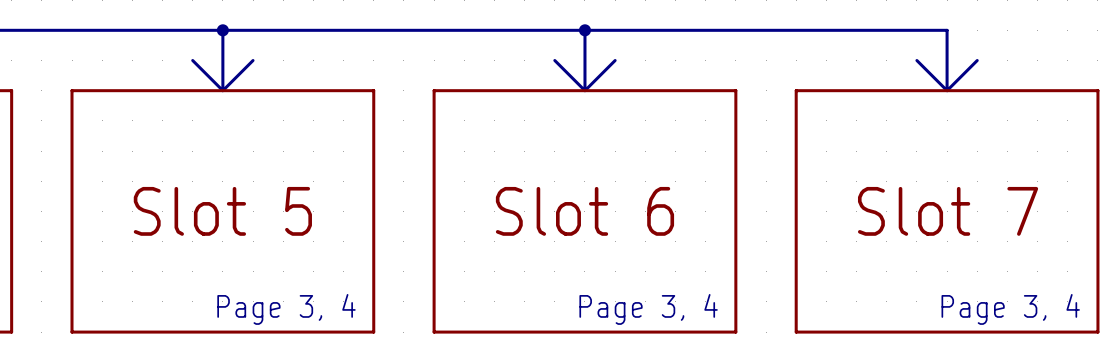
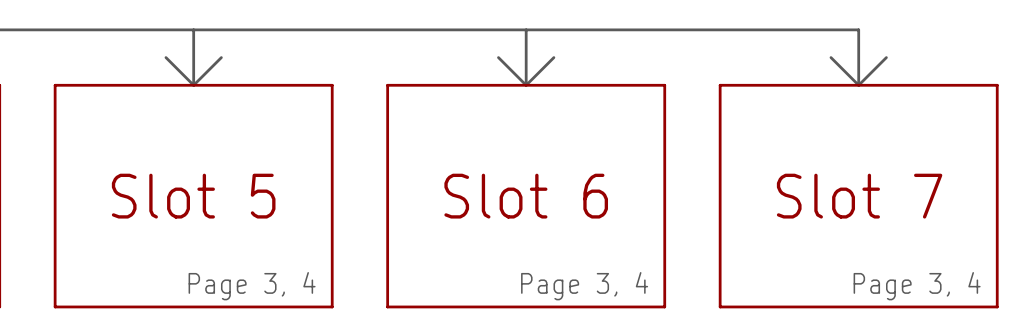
part: (222, 30) -> none
part: (584, 30) -> none

